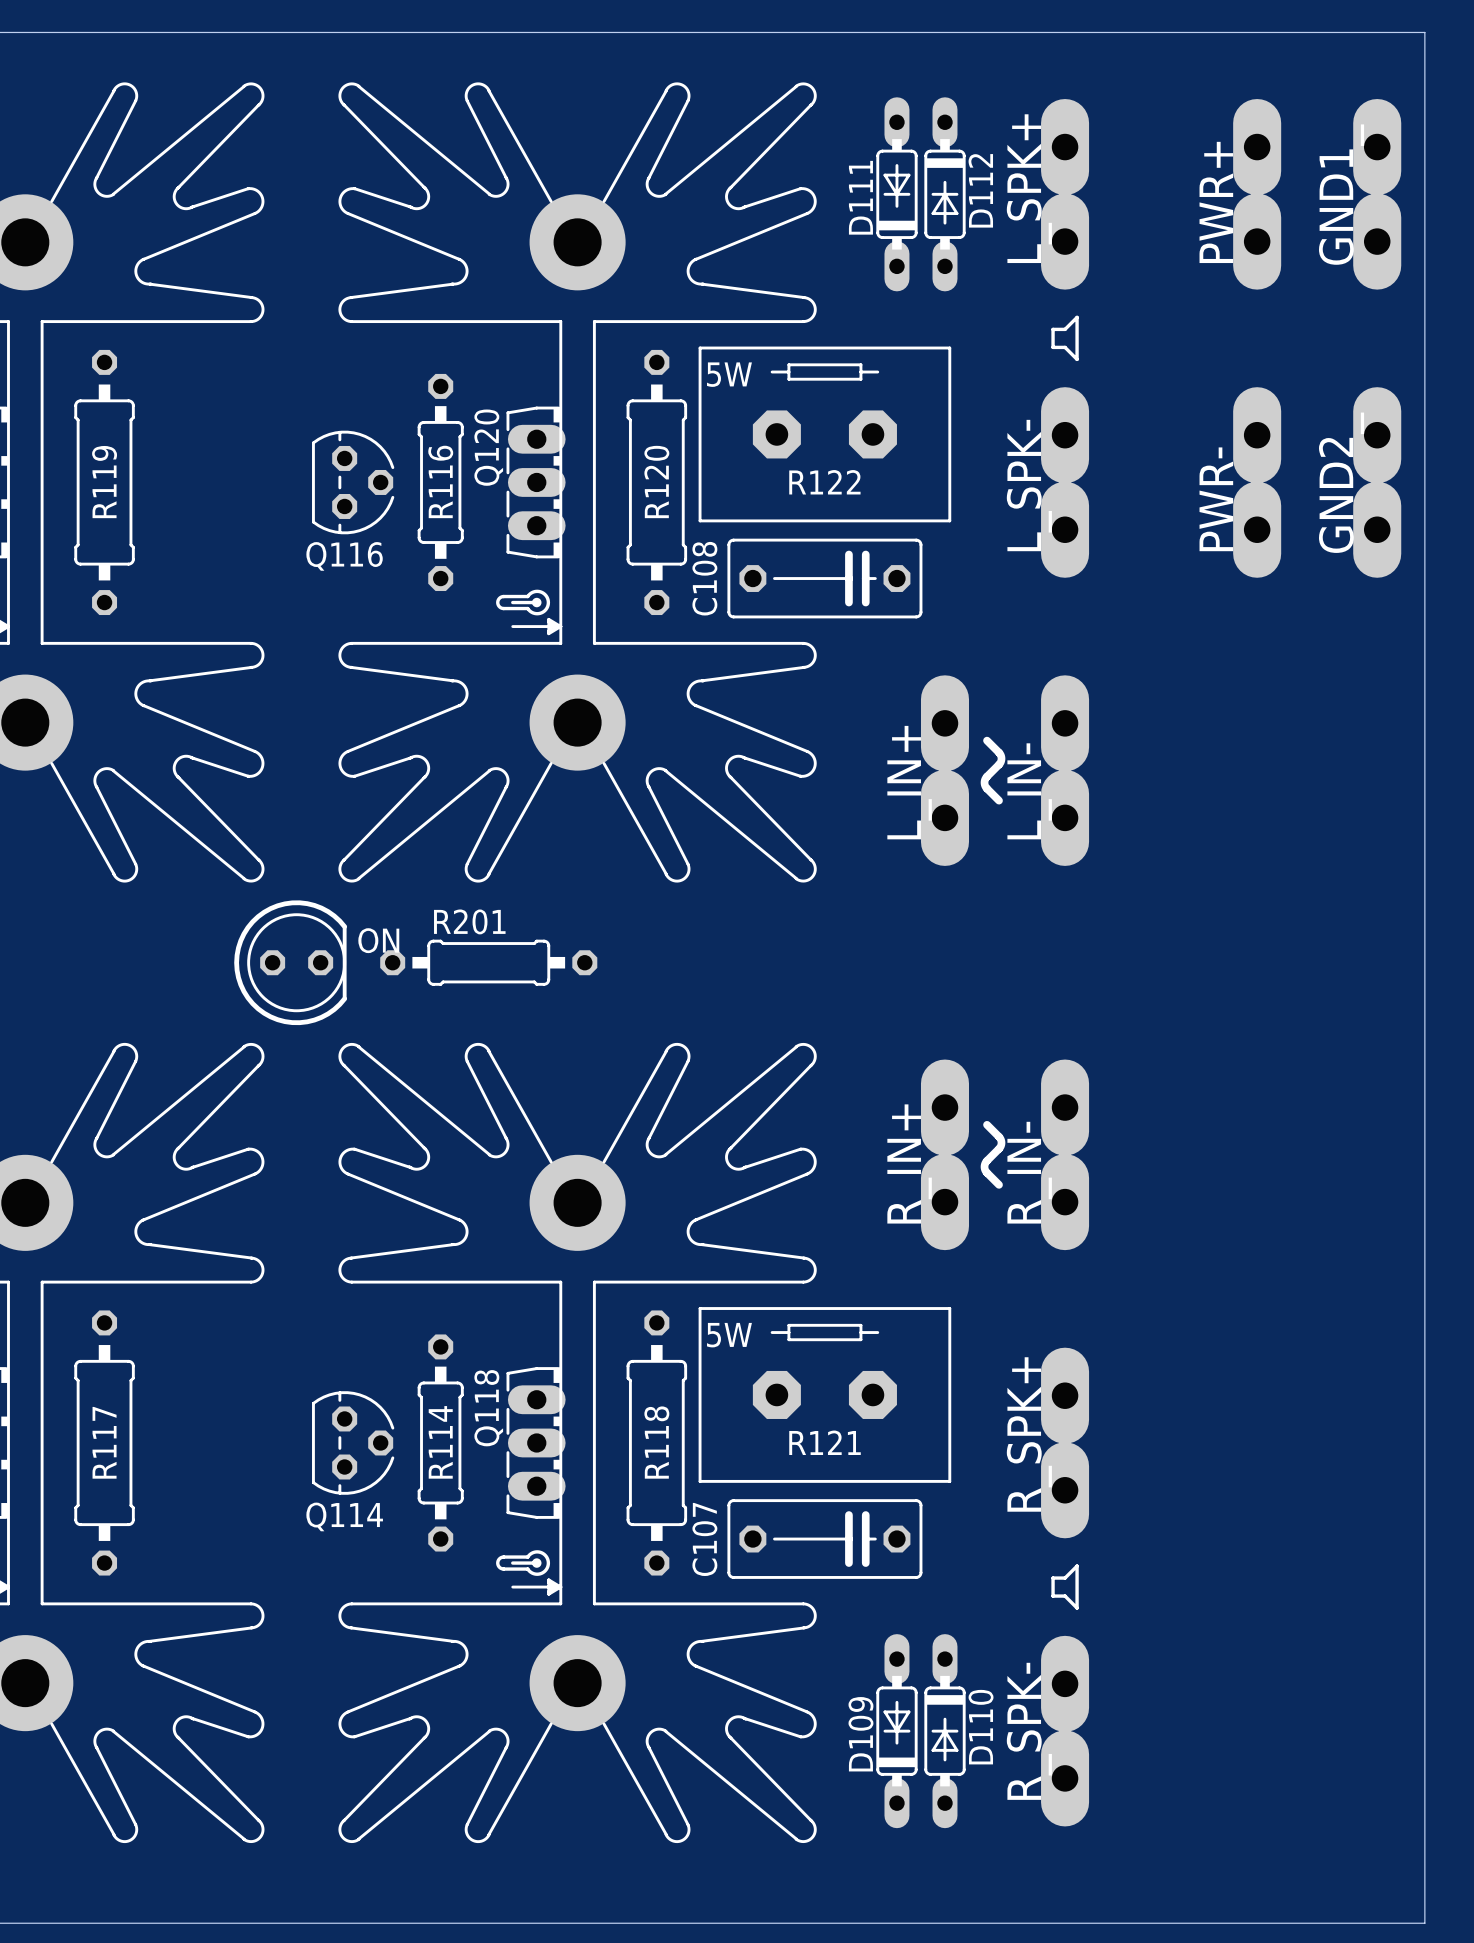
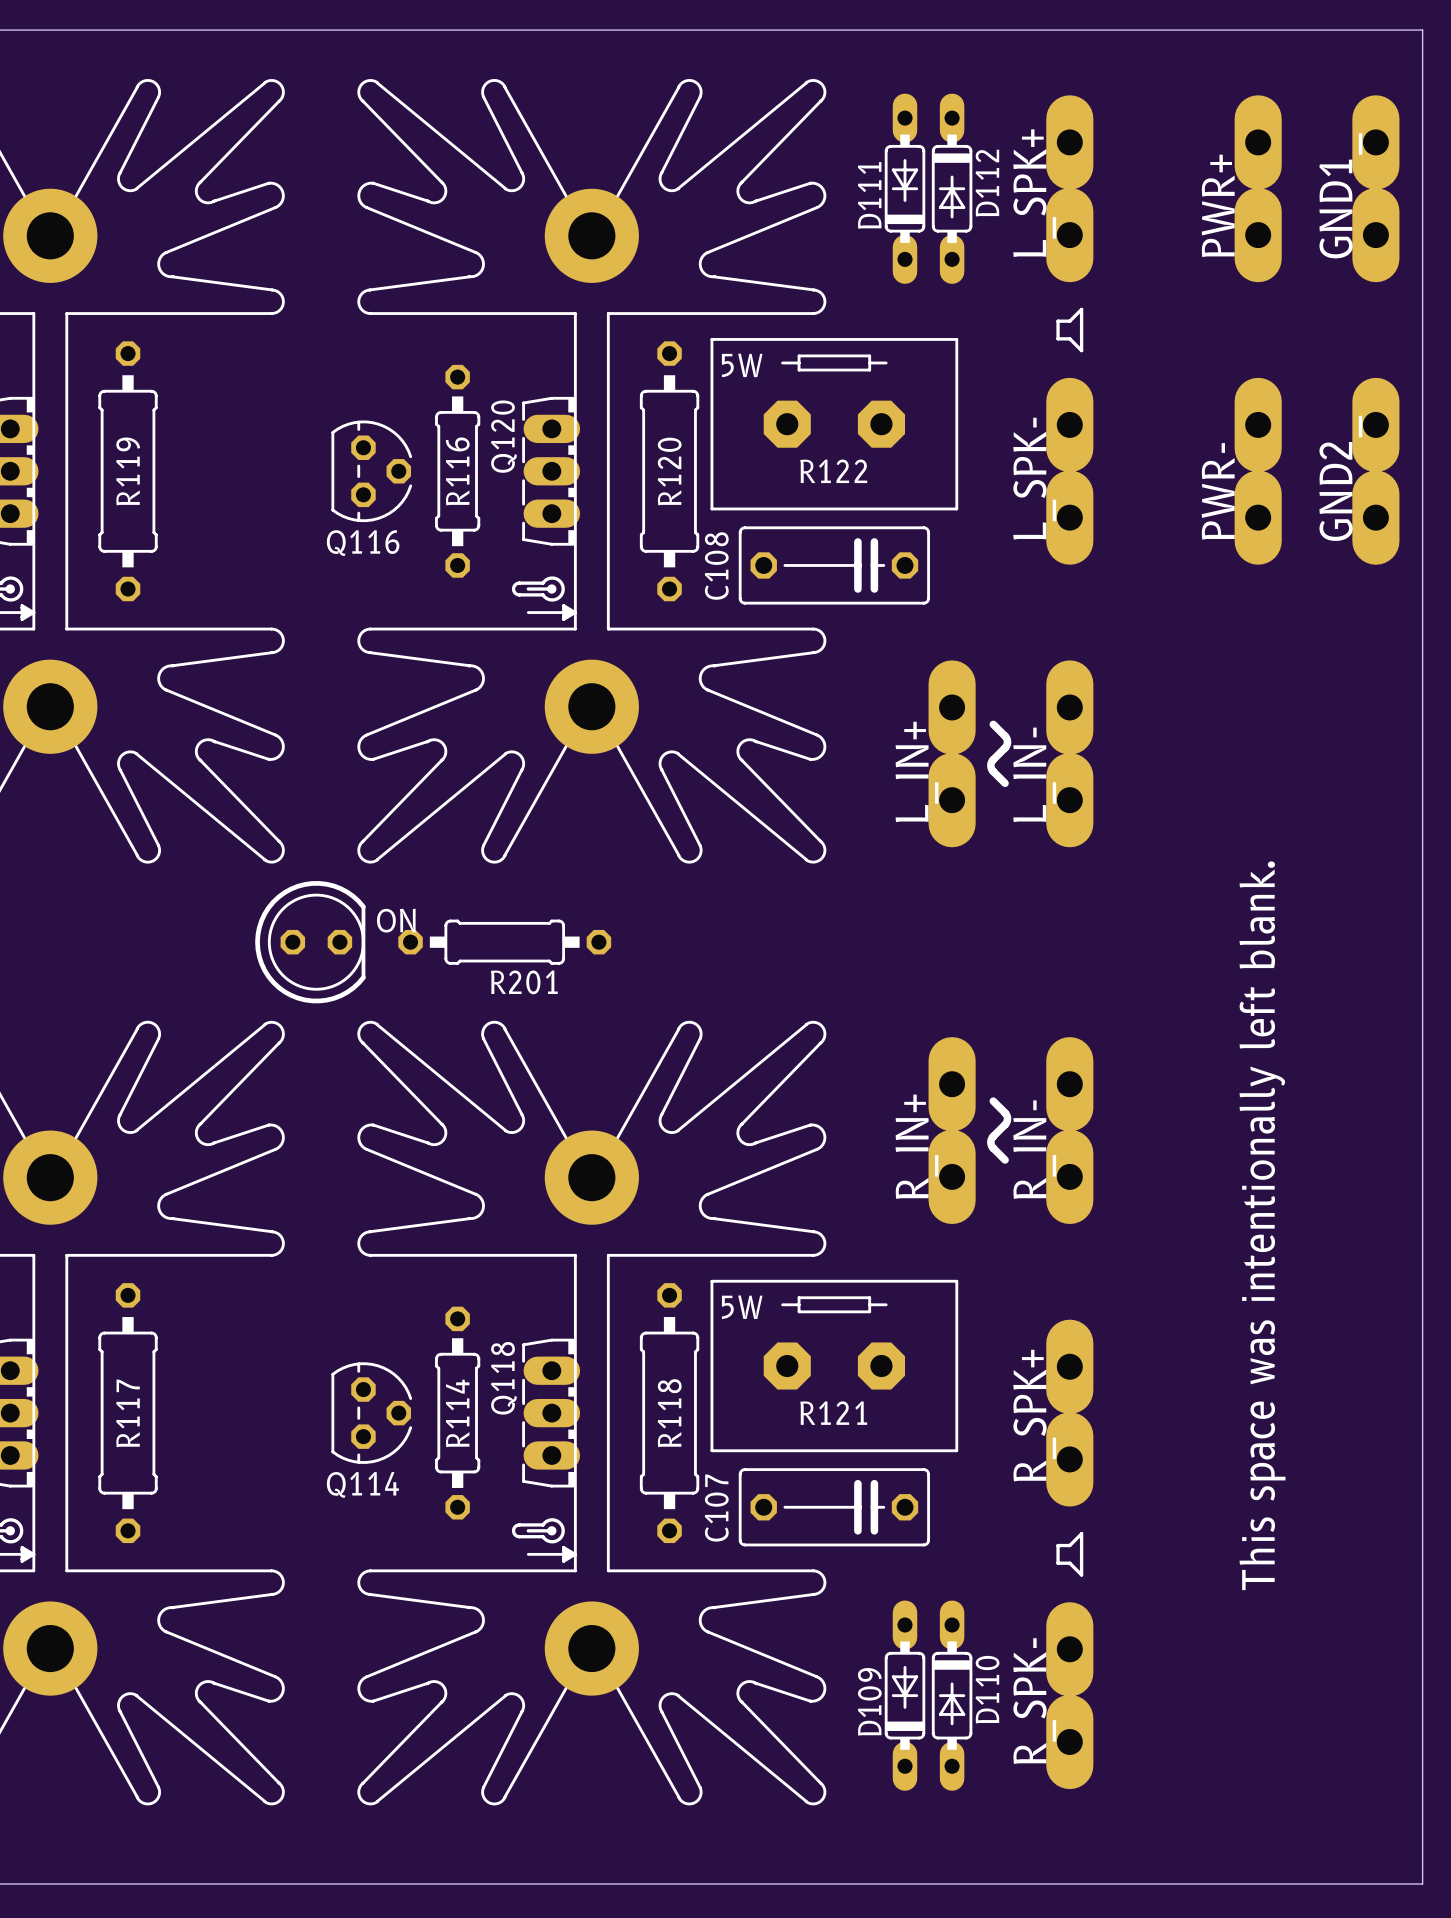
R201 name position: R201 (469, 921) -> R201 (524, 982)
text: none -> This space was intentionally left blank. (1262, 1225)

